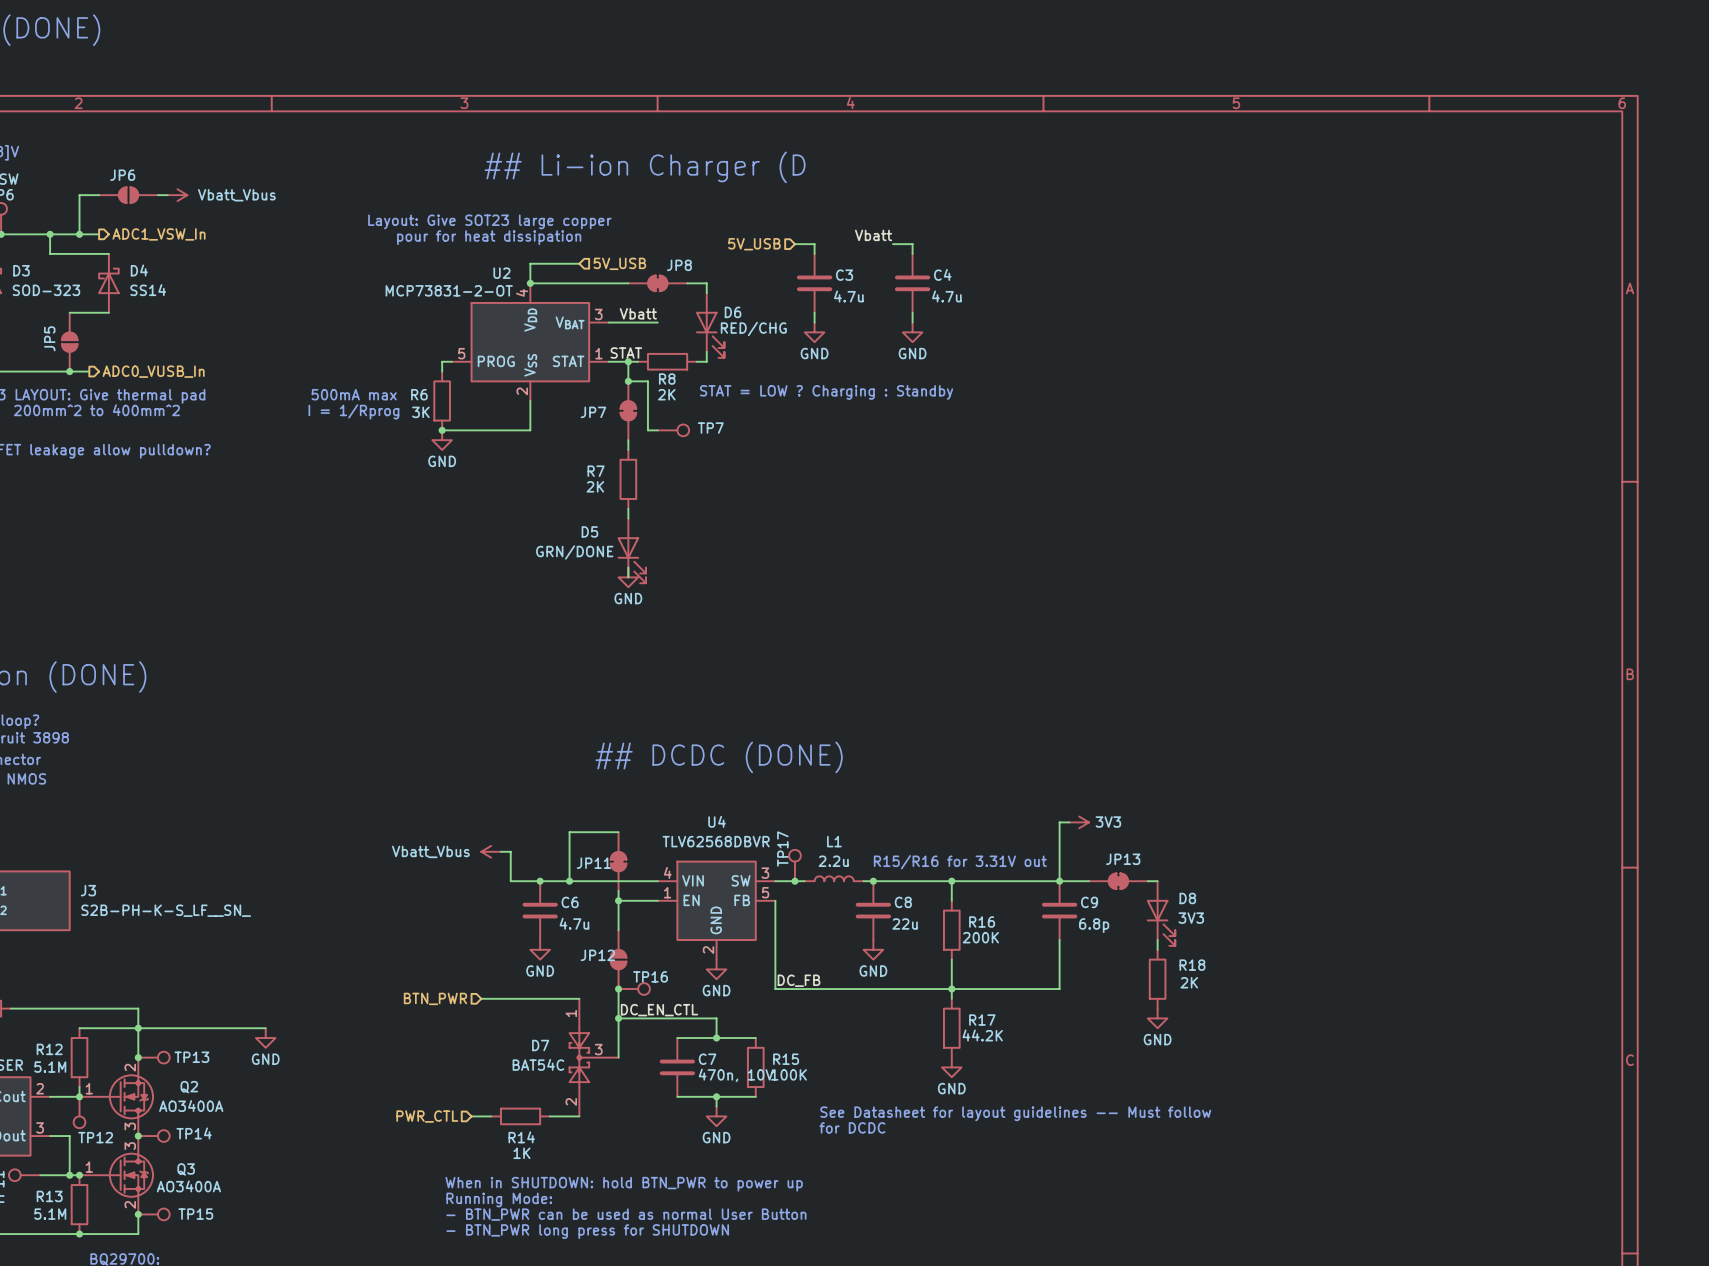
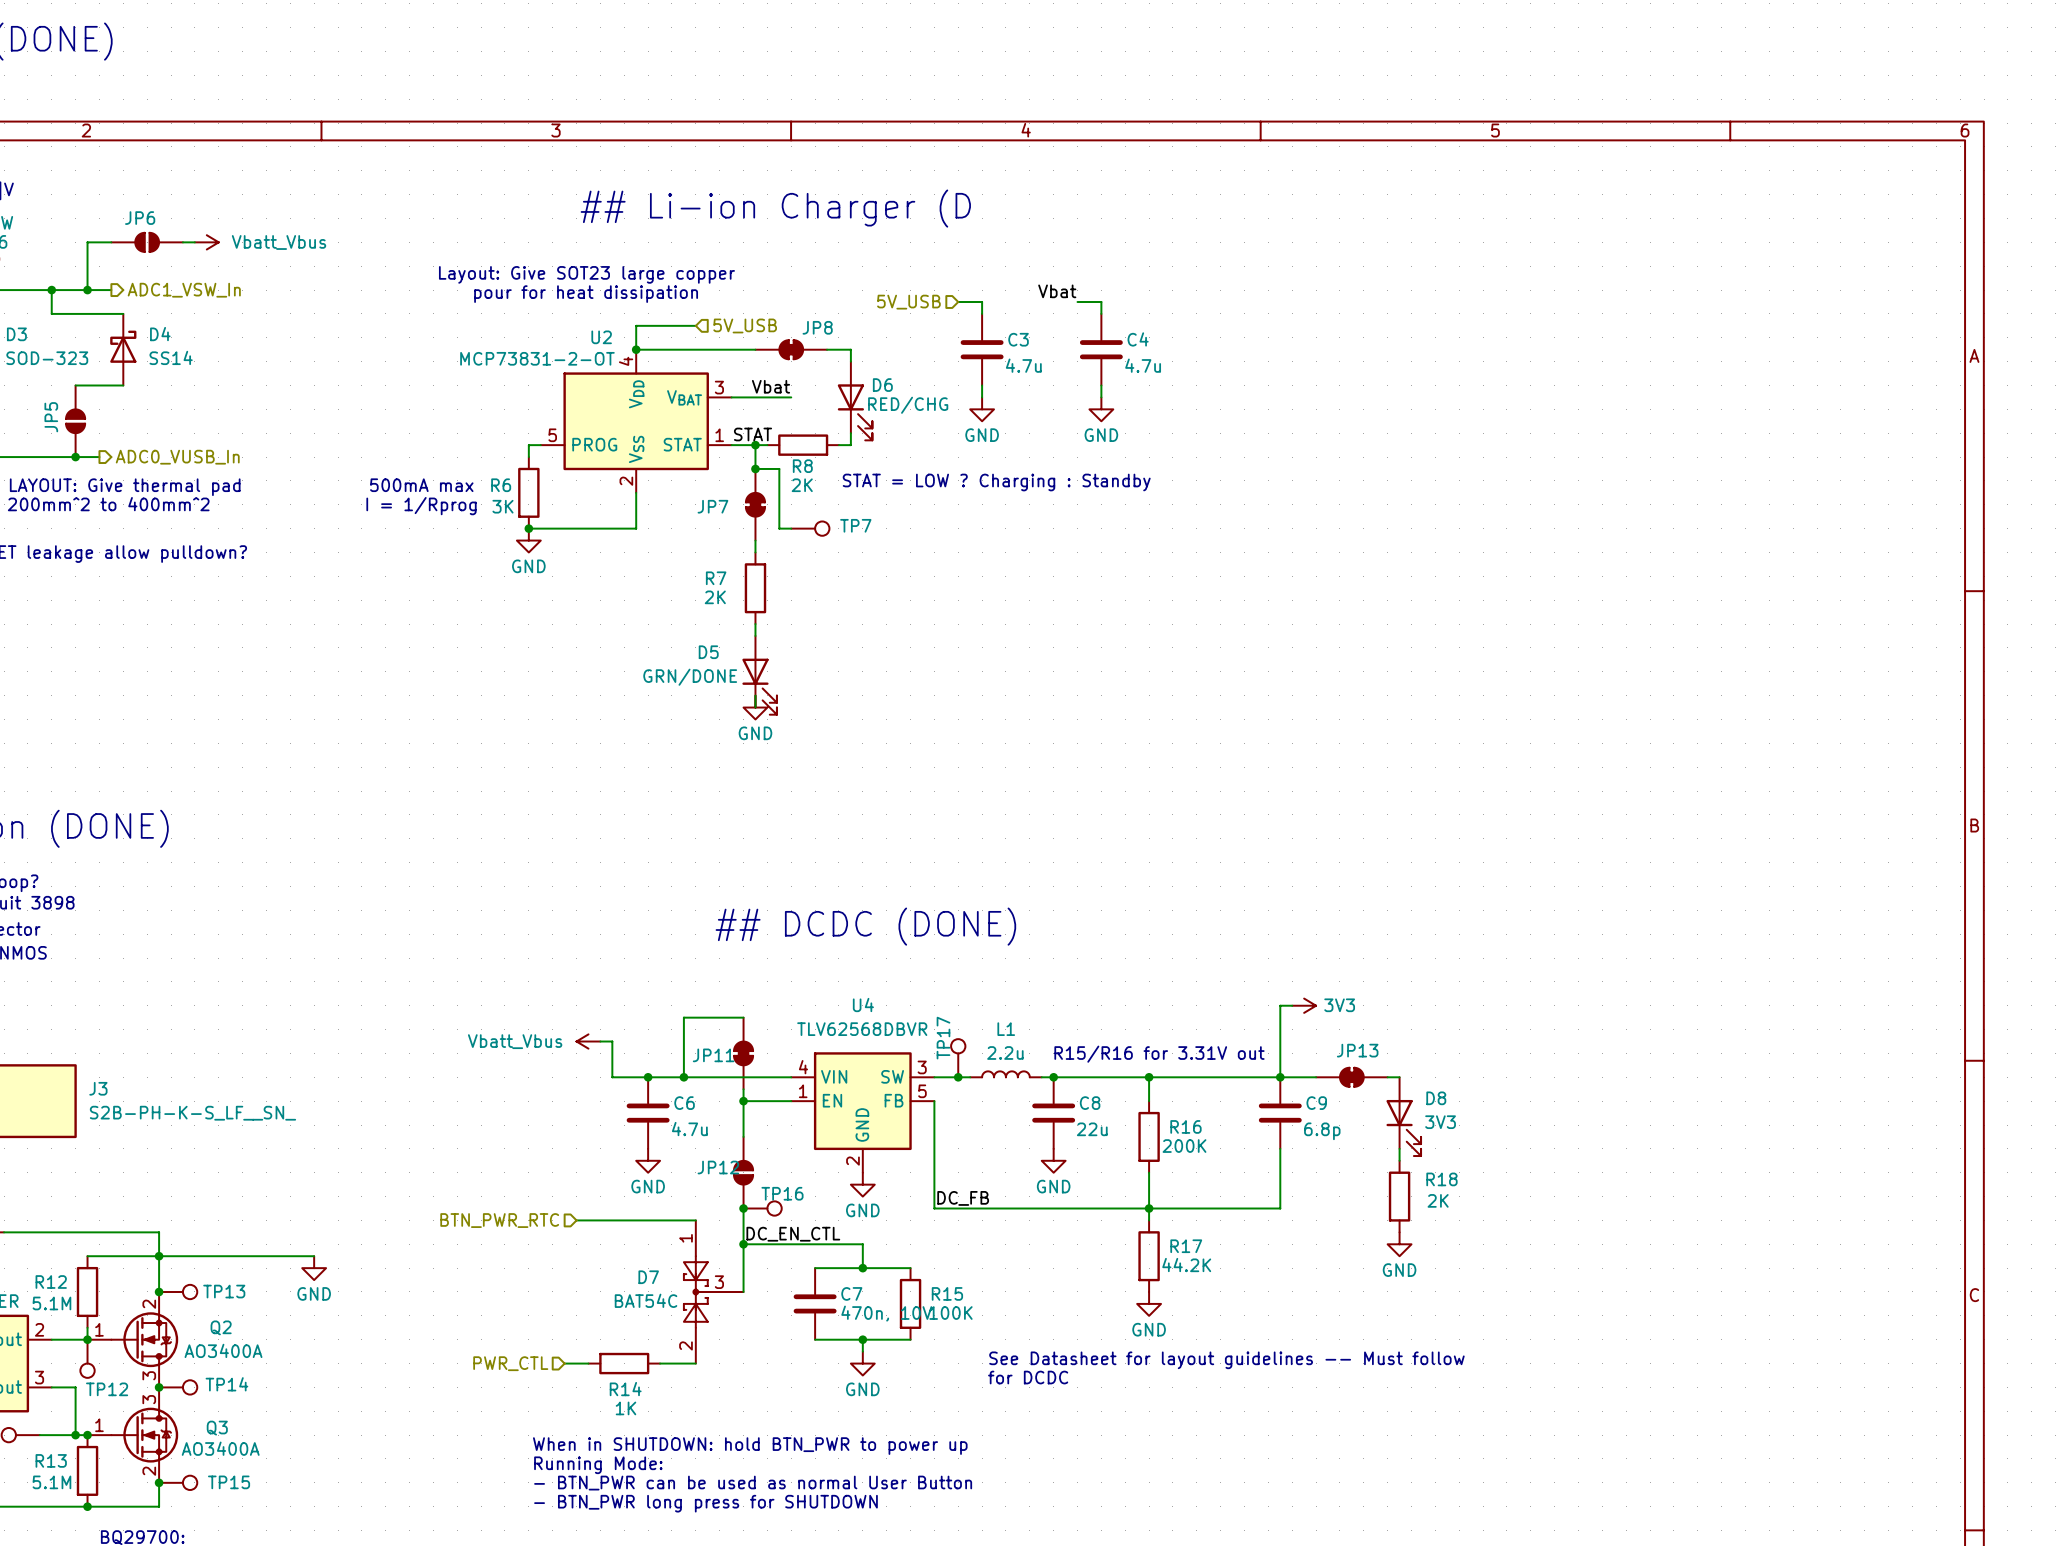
label: Vbatt (873, 235) -> Vbat (1057, 291)
label: Vbatt (638, 313) -> Vbat (771, 386)
hierarchical label: BTN_PWR (435, 998) -> BTN_PWR_RTC (499, 1220)

